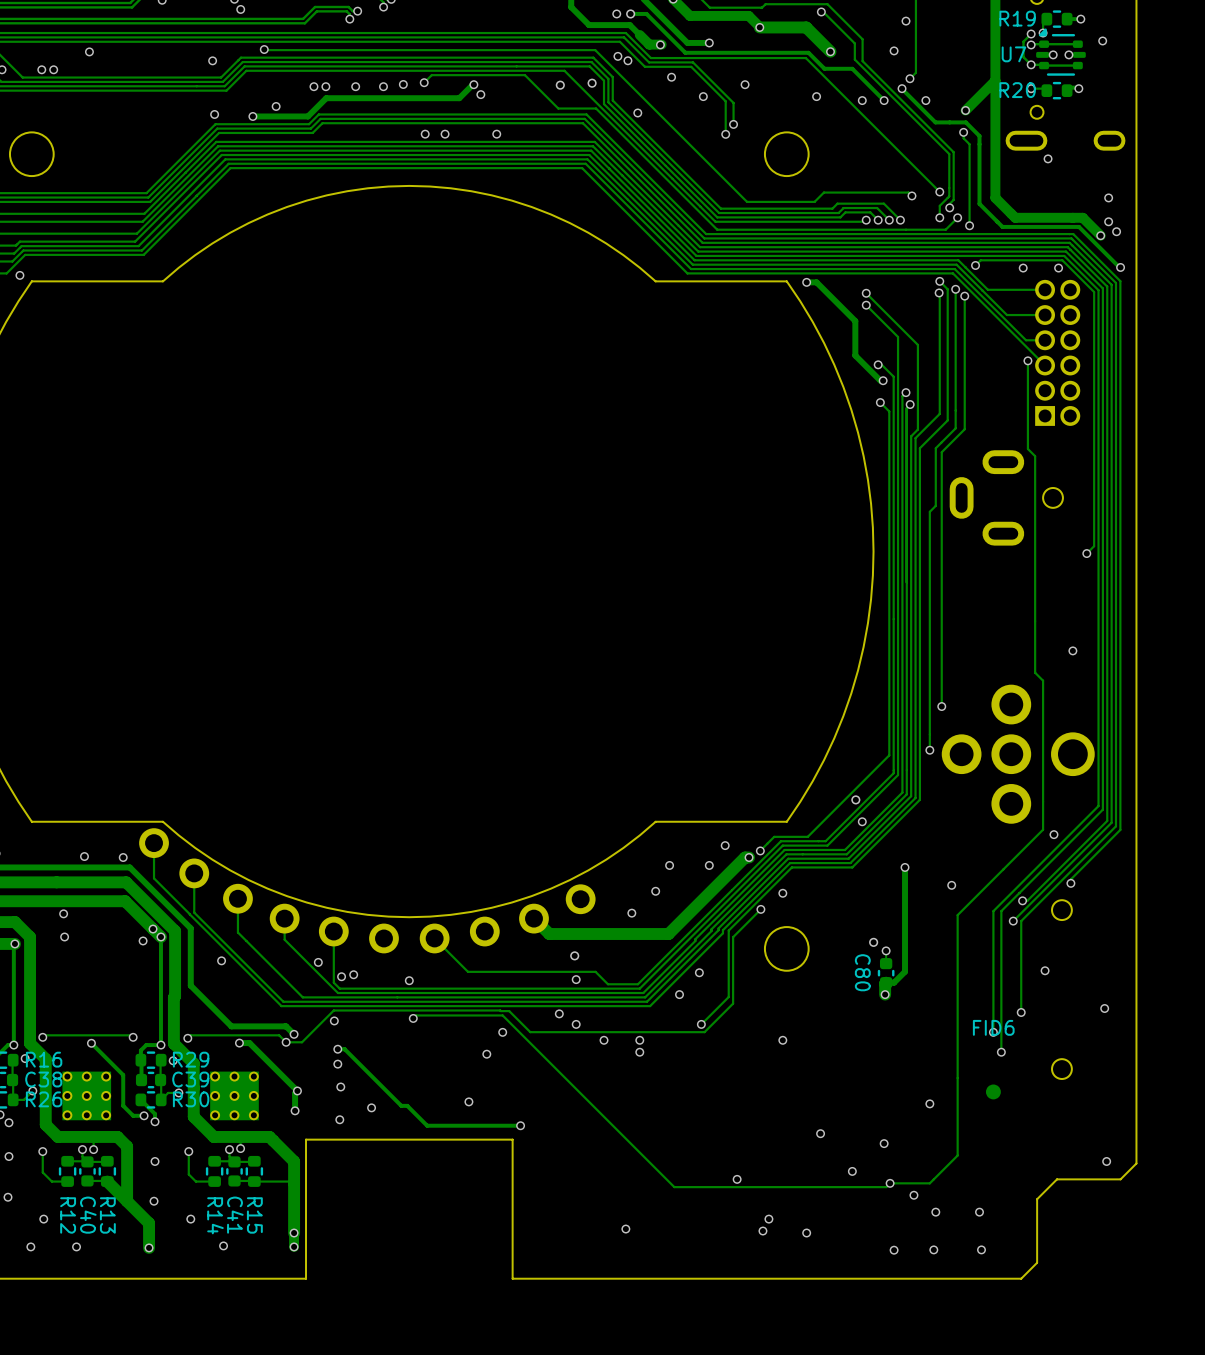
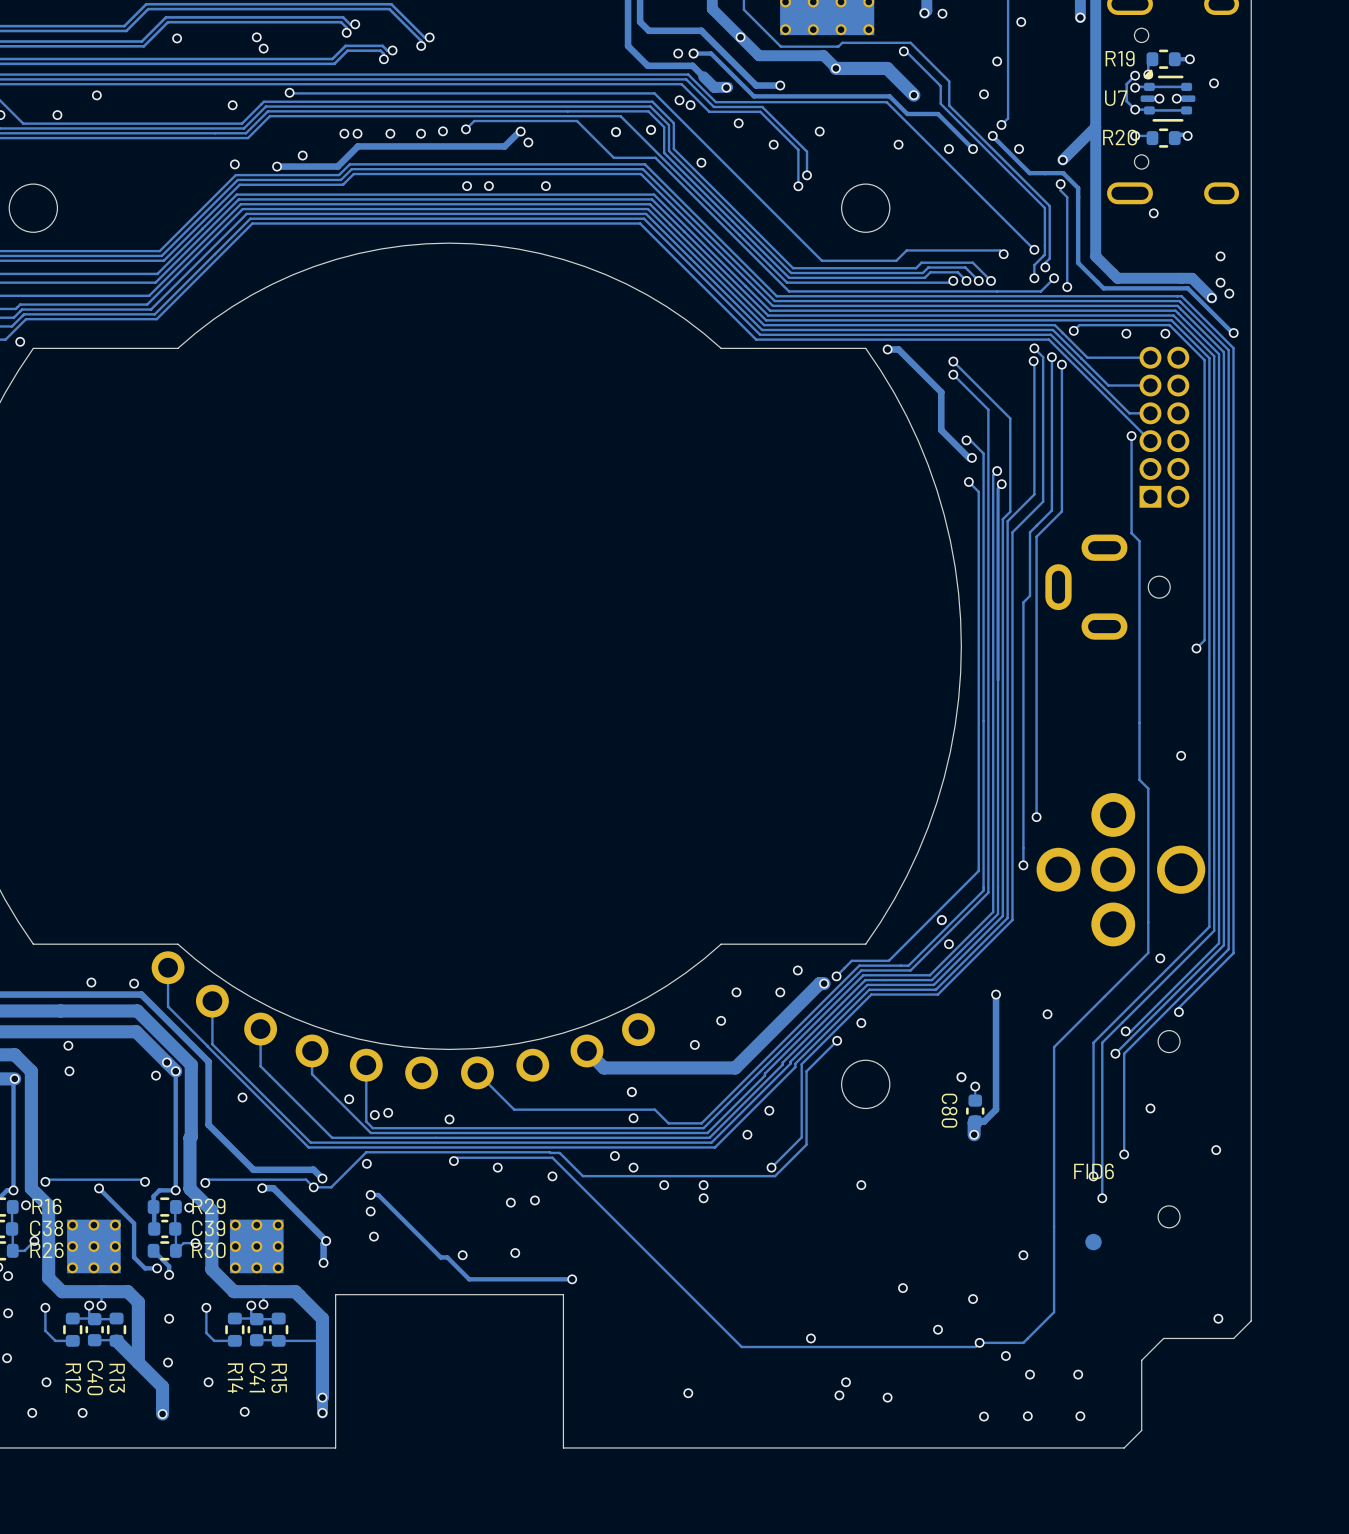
via: (41, 69) -> none
via: none -> (497, 1167)
via: none -> (510, 1202)
via: none -> (462, 1255)
via: (371, 1107) -> none
via: (339, 1119) -> none

